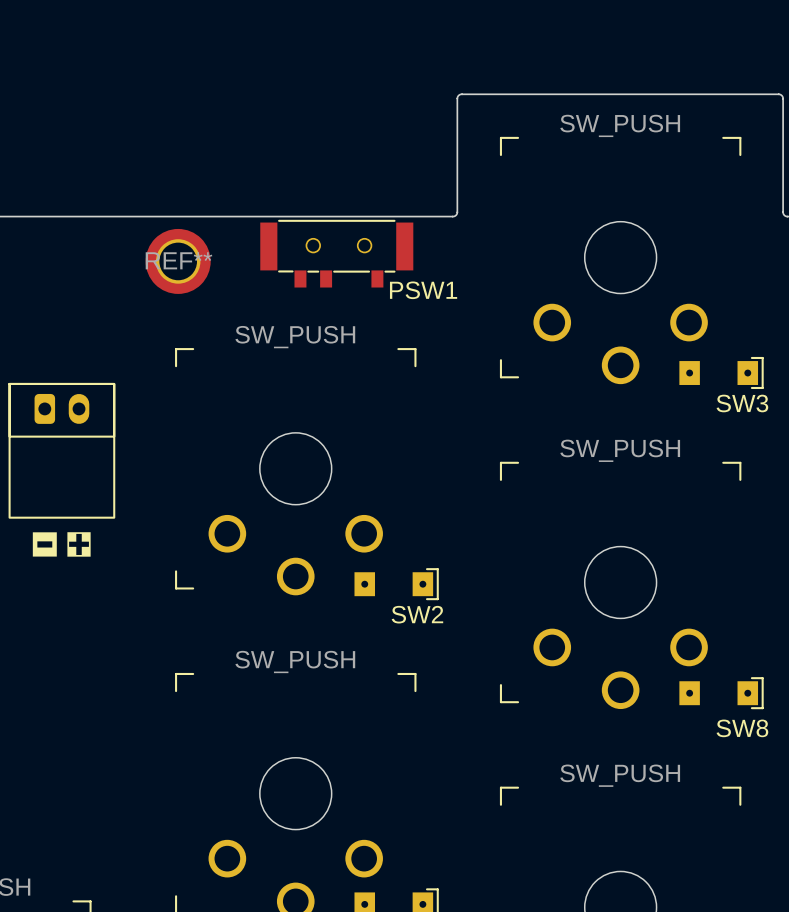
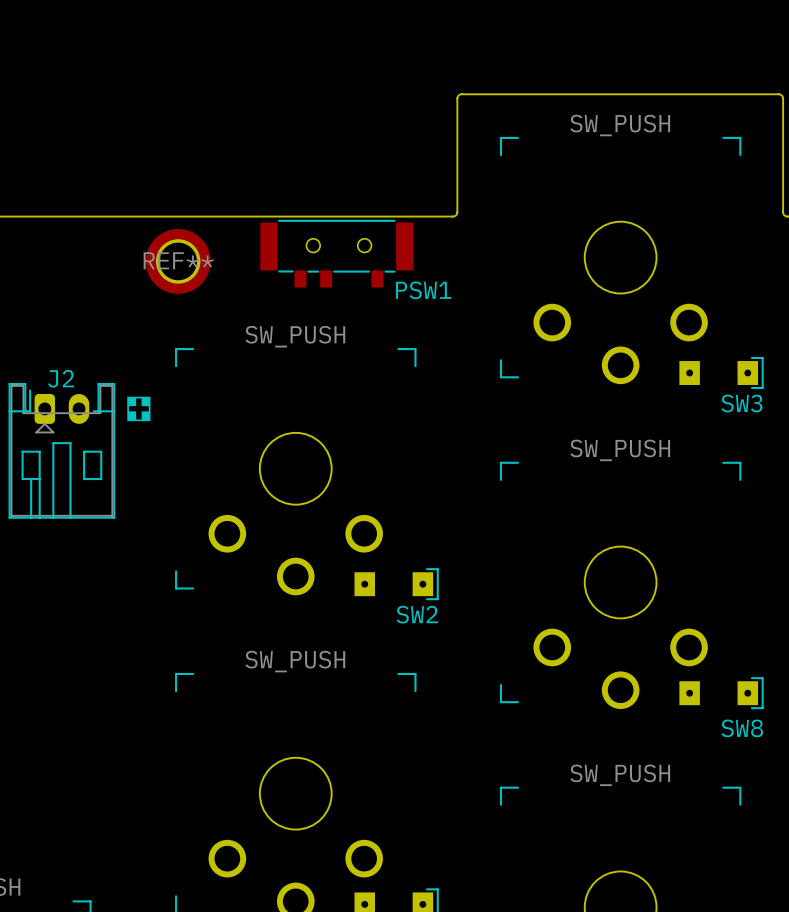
part: (61, 450) -> none
J2: none -> (61, 450)
drawing: [32, 532, 57, 557] -> none
drawing position: (79, 544) -> (138, 408)

